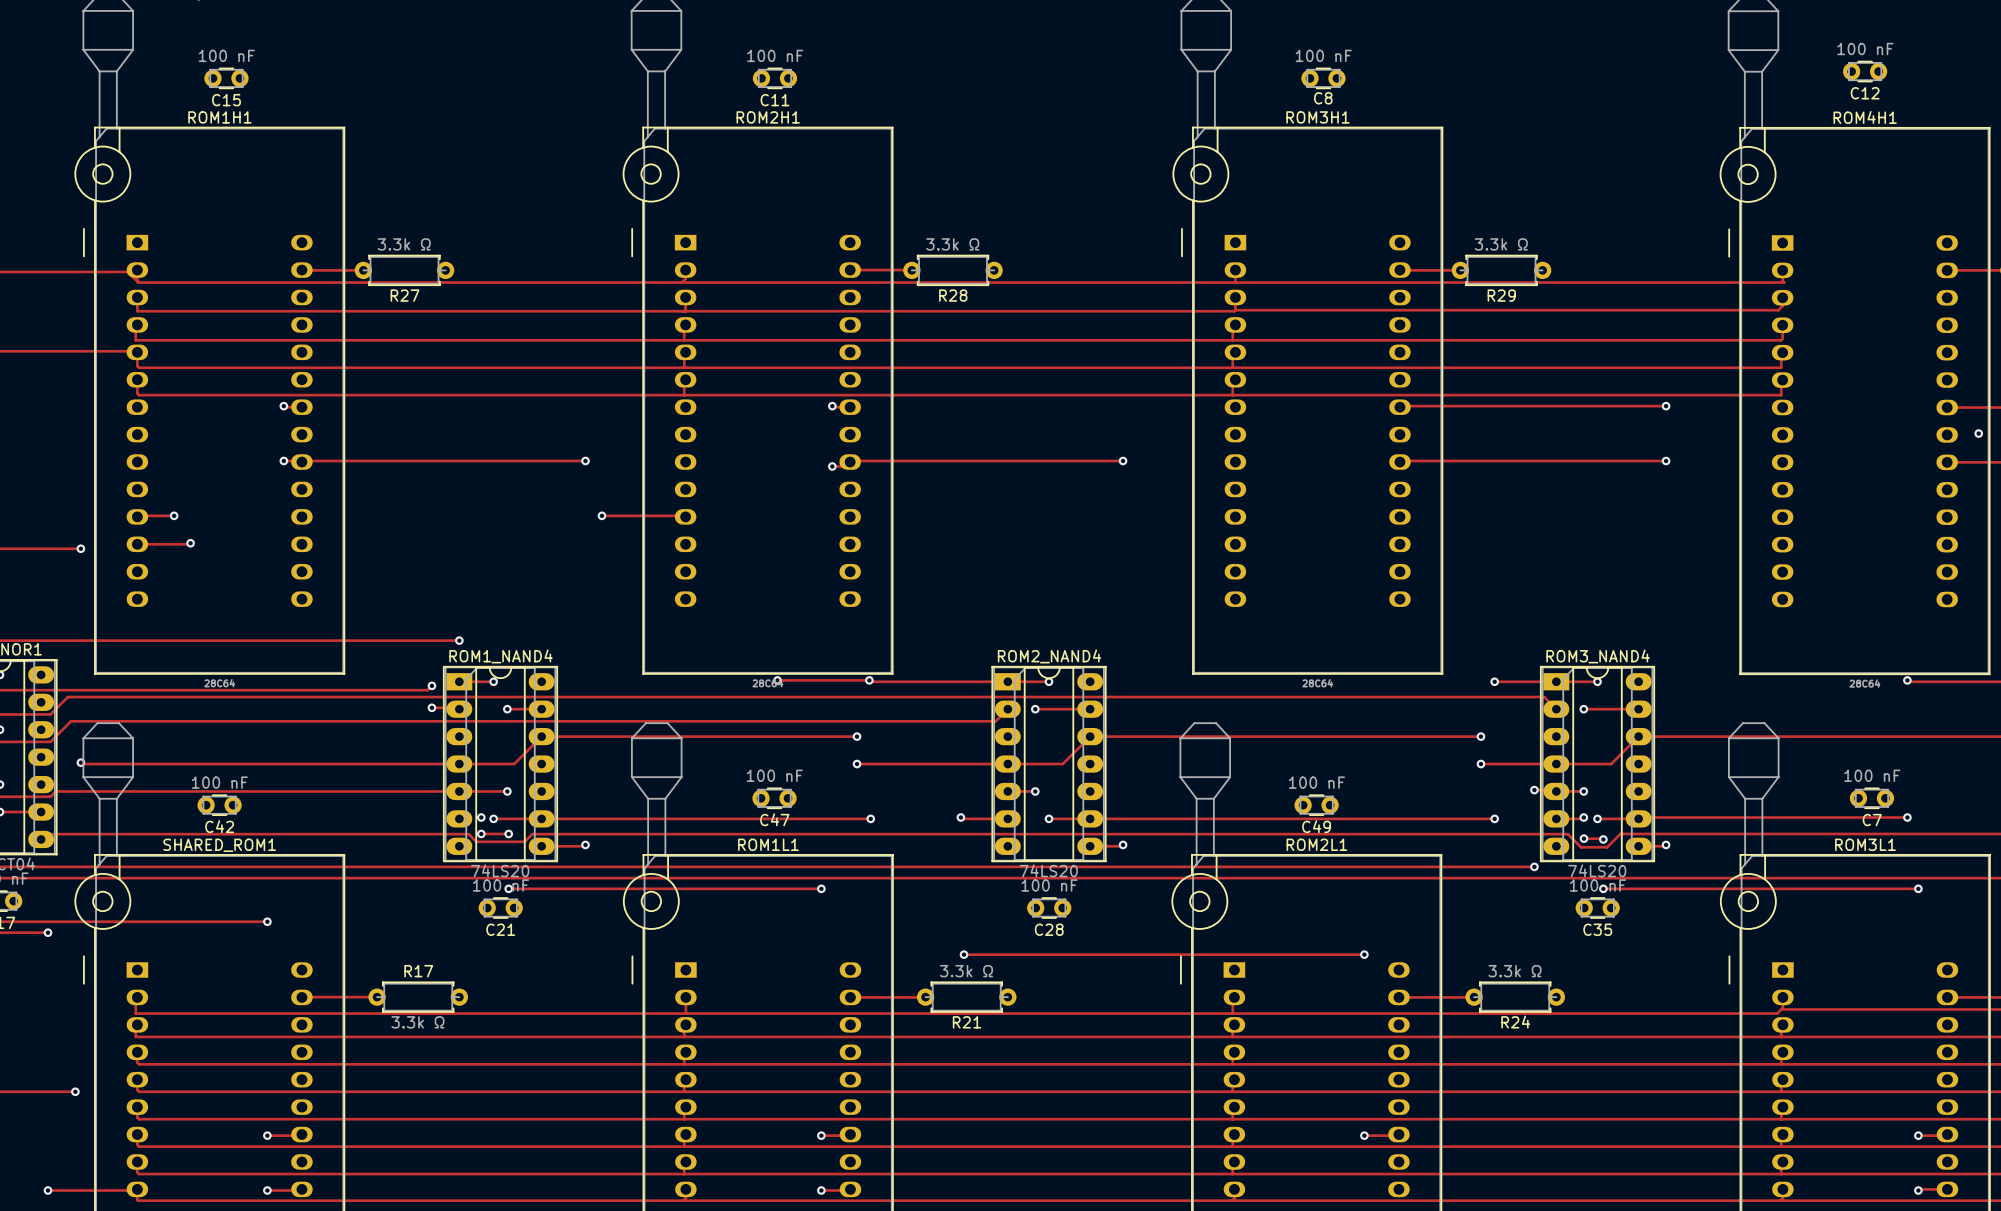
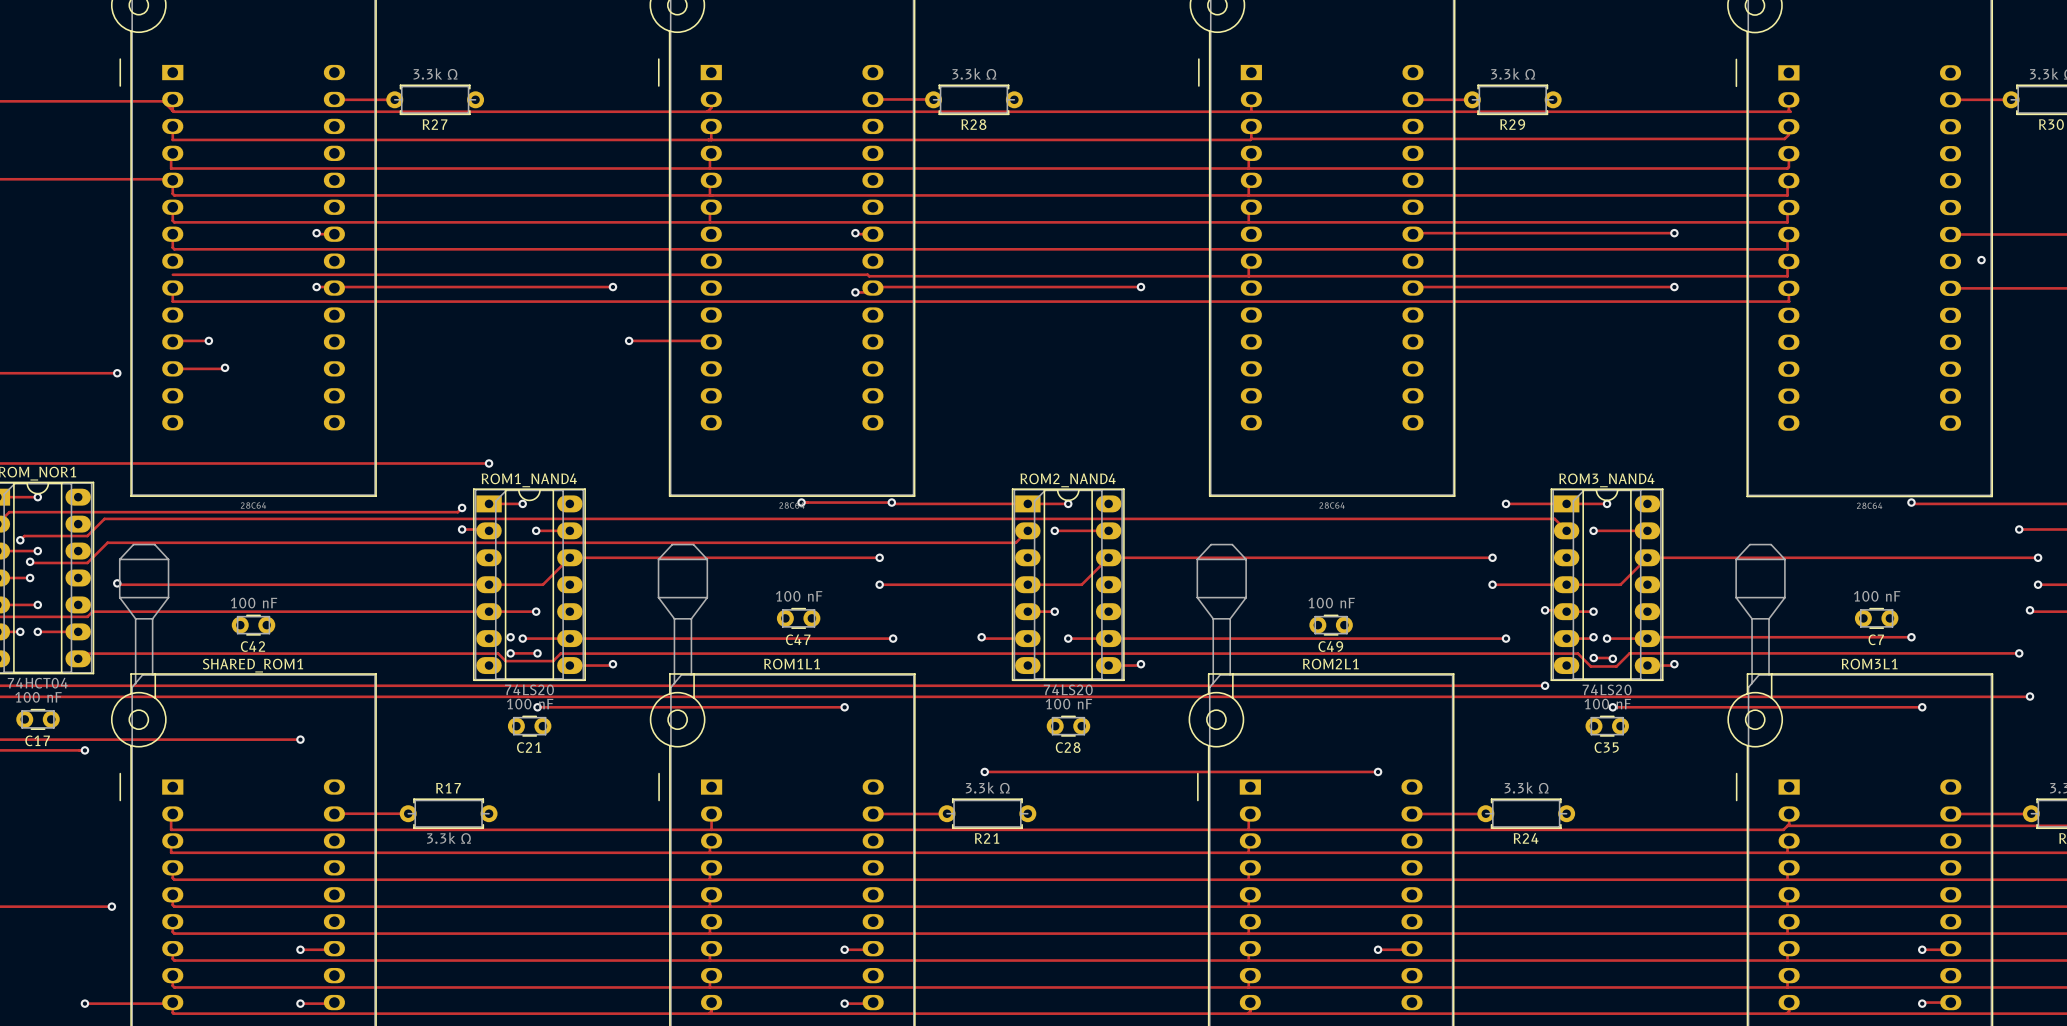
track: none -> (172, 234) (174, 249) (1787, 249) (1788, 234)
track: none -> (1251, 261) (1248, 263) (1248, 276)
track: none -> (1788, 261) (1787, 276) (172, 274)
track: none -> (172, 288) (172, 301) (1789, 301) (1788, 288)

